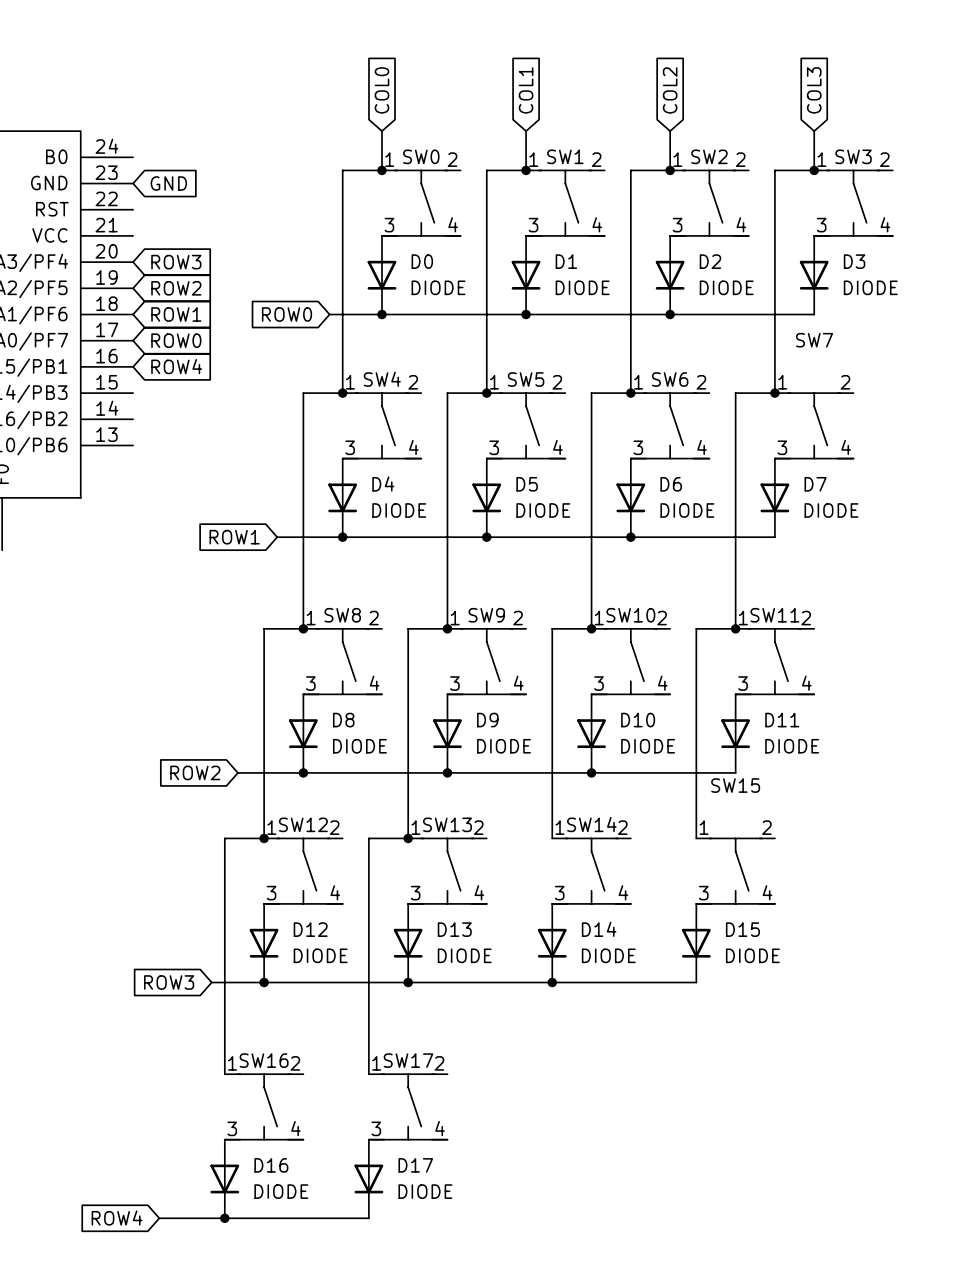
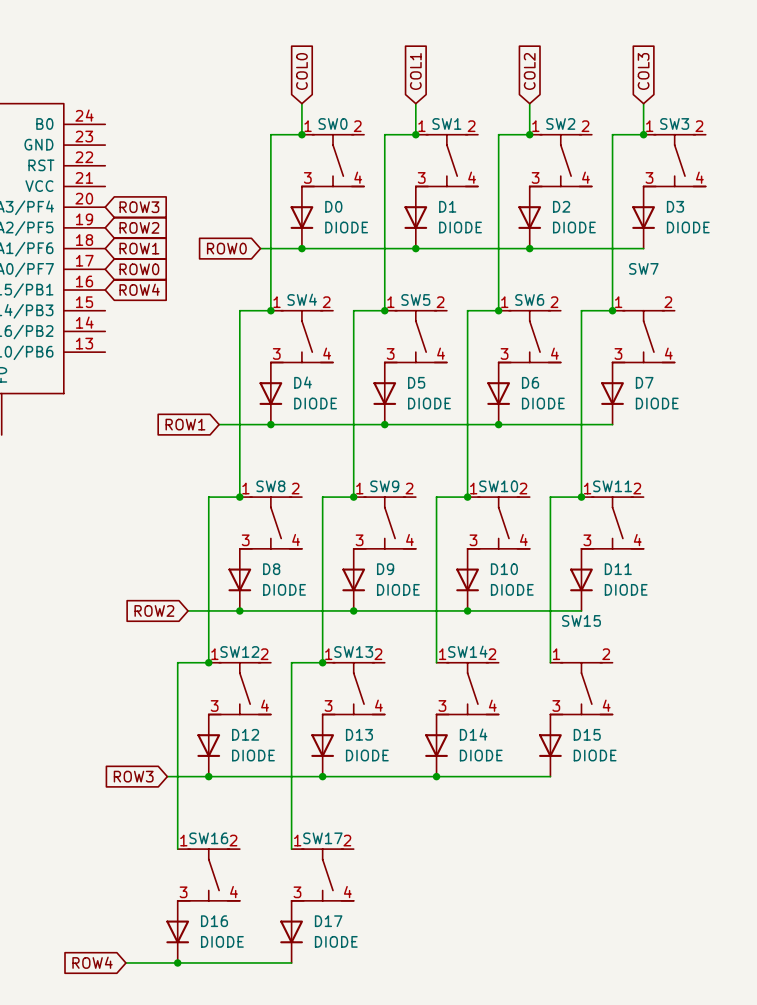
global label: GND (168, 183) -> none

